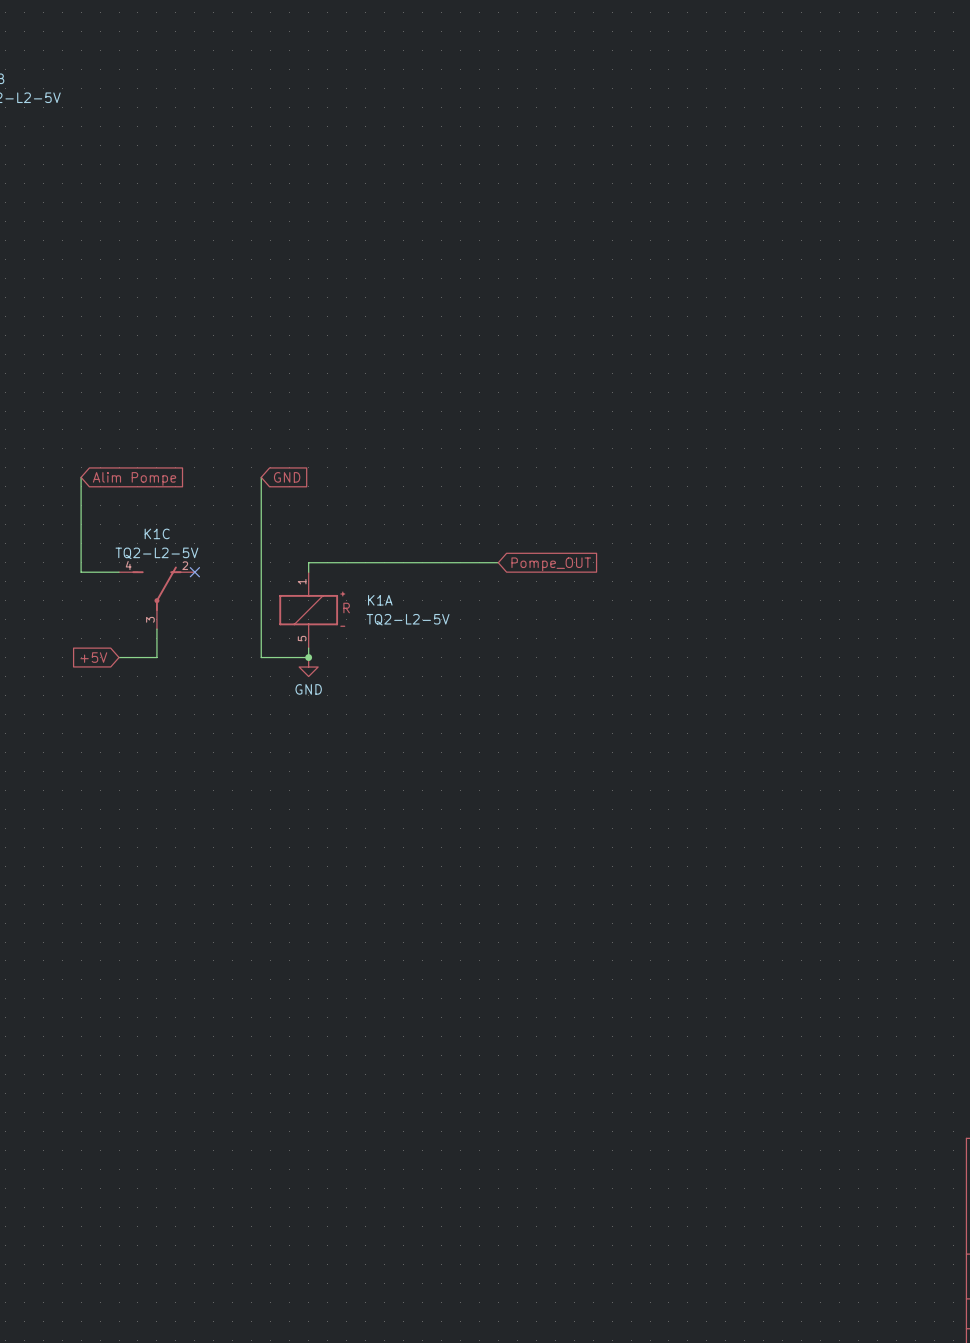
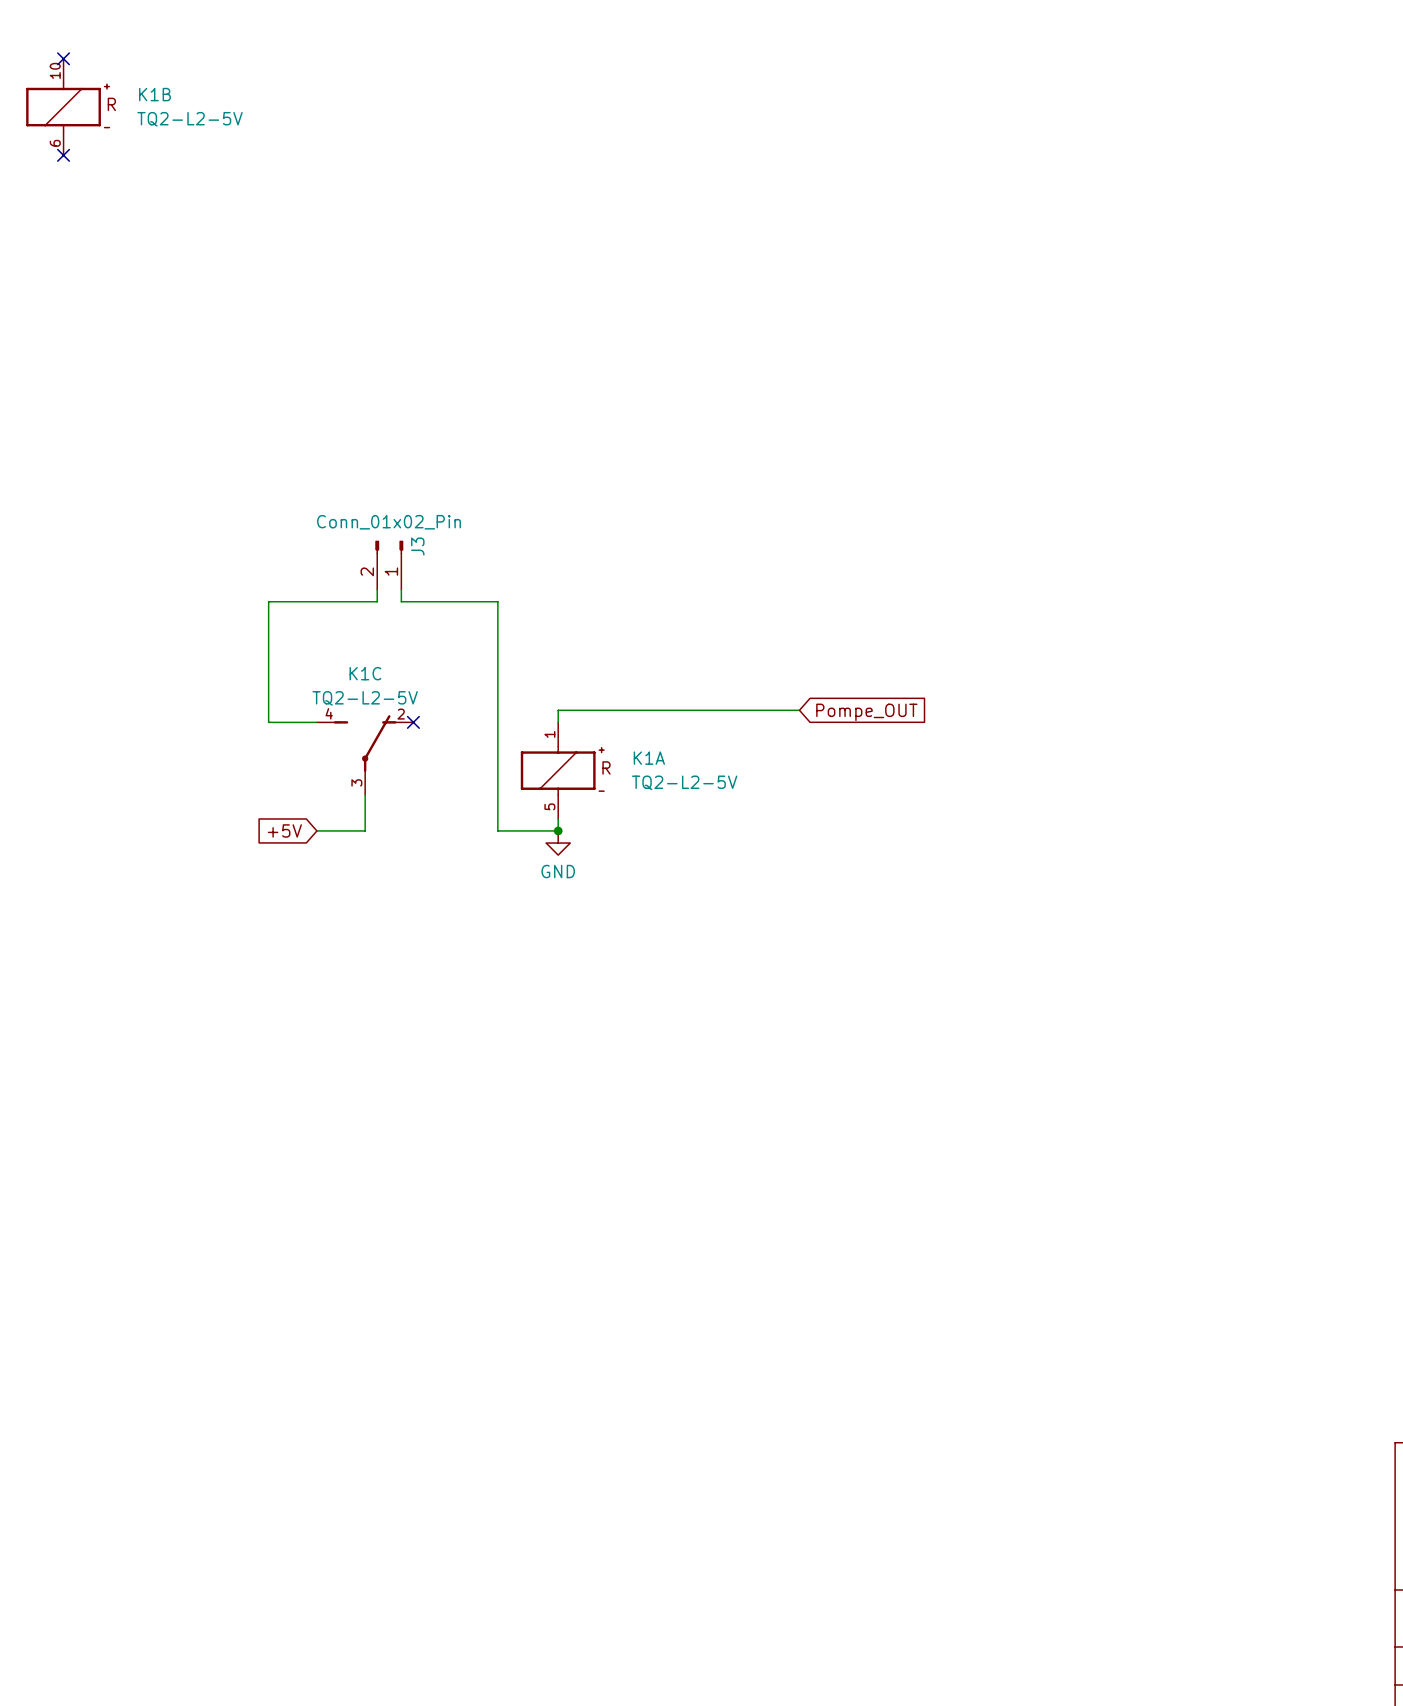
J3: none -> Conn_01x02_Pin (389, 565)
wire: none -> (377, 589) (377, 601) (268, 601)
wire: none -> (401, 589) (401, 601) (497, 601)
global label: GND (287, 477) -> none
global label: Alim Pompe (134, 478) -> none

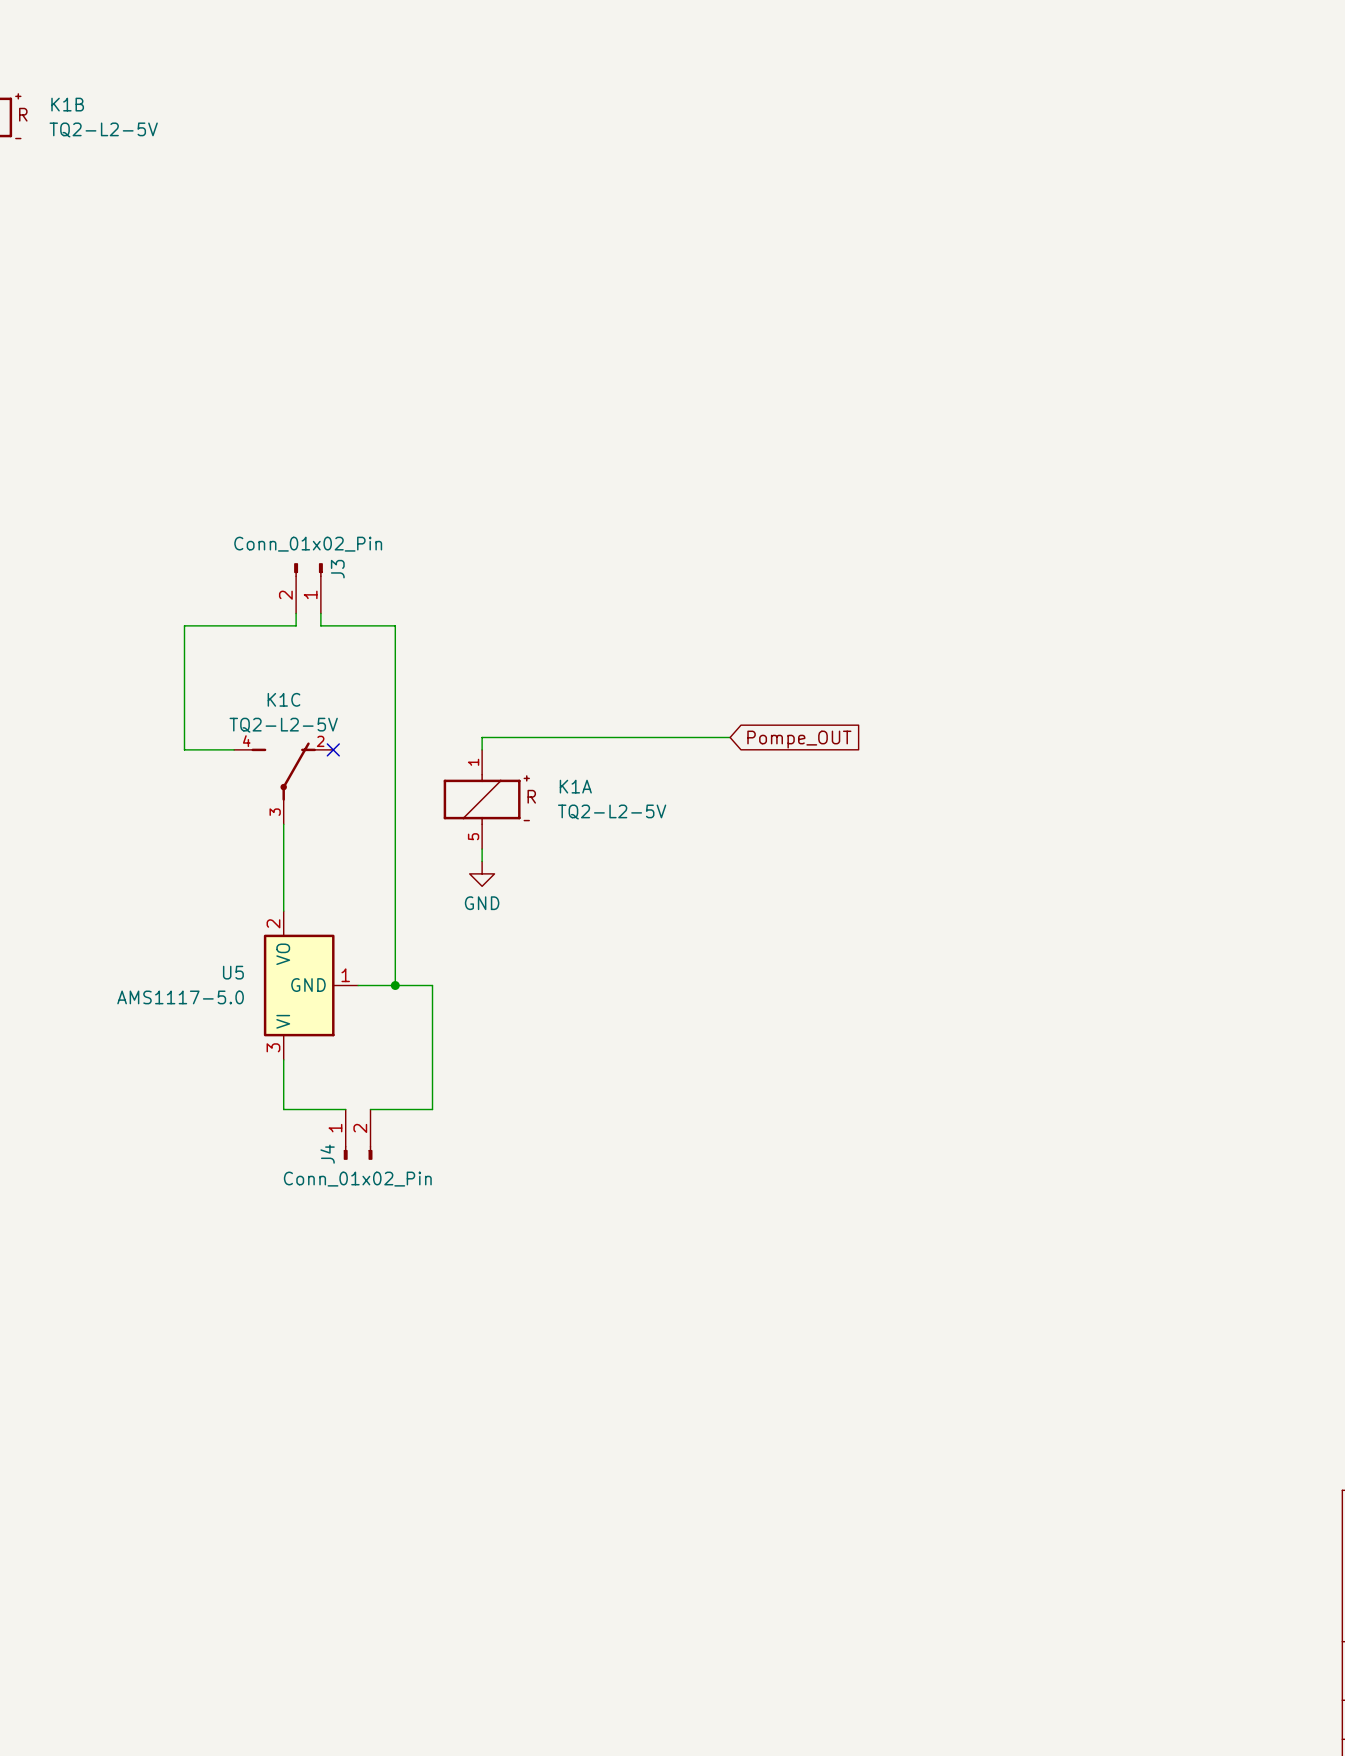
wire: (473, 601) (497, 601) (497, 830) (558, 830) -> (395, 625) (395, 985)
global label: +5V (284, 830) -> none
wire: (316, 830) (365, 830) -> (283, 911) (283, 861)
junction: (558, 830) -> none
U5: none -> AMS1117-5.0 (310, 985)
wire: none -> (358, 985) (432, 985) (432, 1109) (370, 1109)
junction: none -> (395, 985)
wire: none -> (283, 1059) (283, 1109) (345, 1109)
J4: none -> Conn_01x02_Pin (358, 1134)

